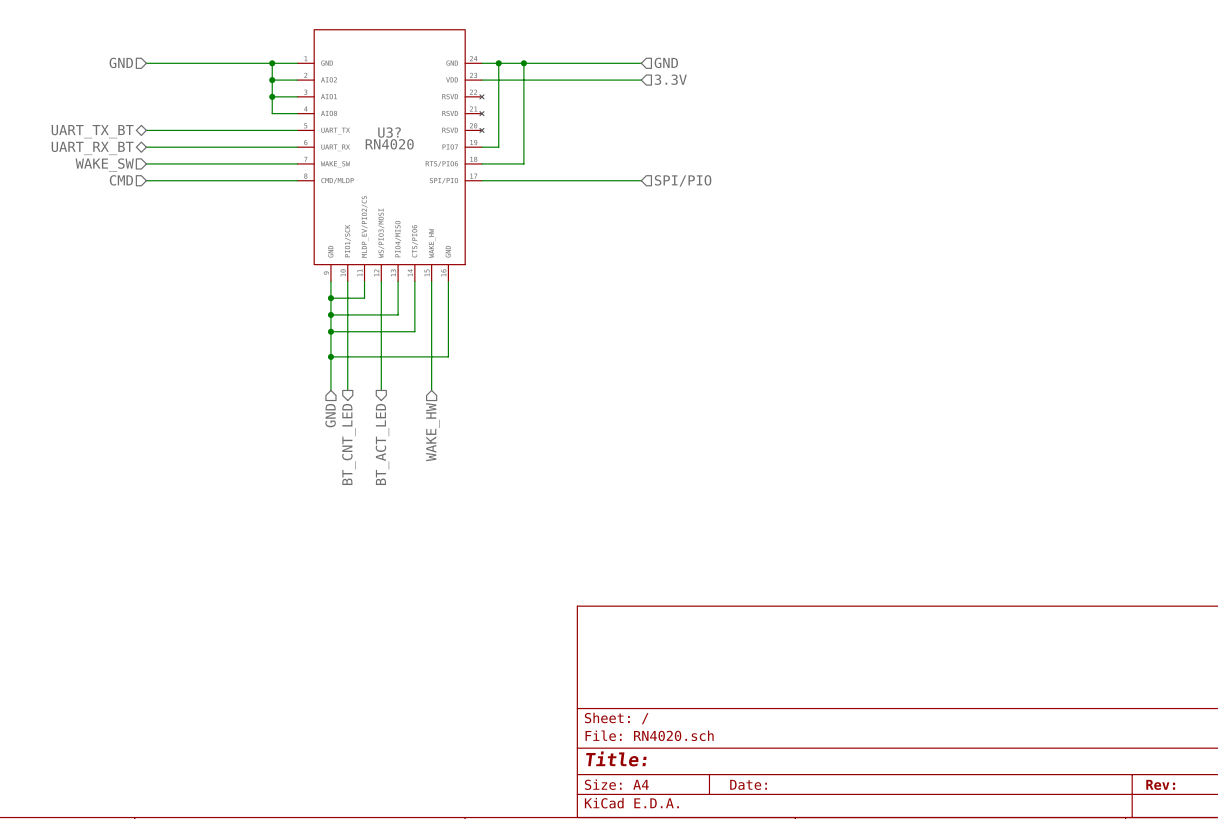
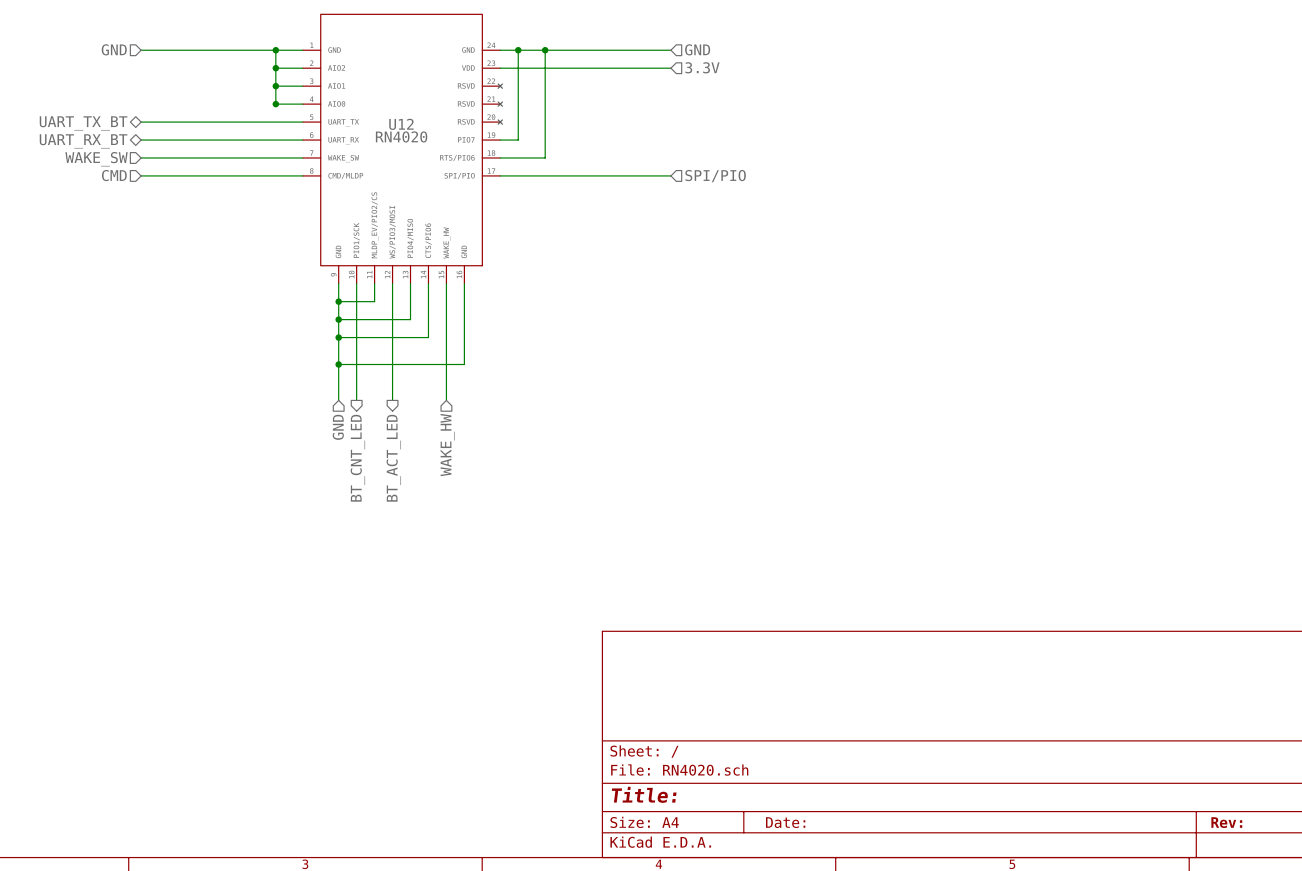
junction: none -> (275, 104)
U3? name: U3? (389, 132) -> U12 (401, 124)

